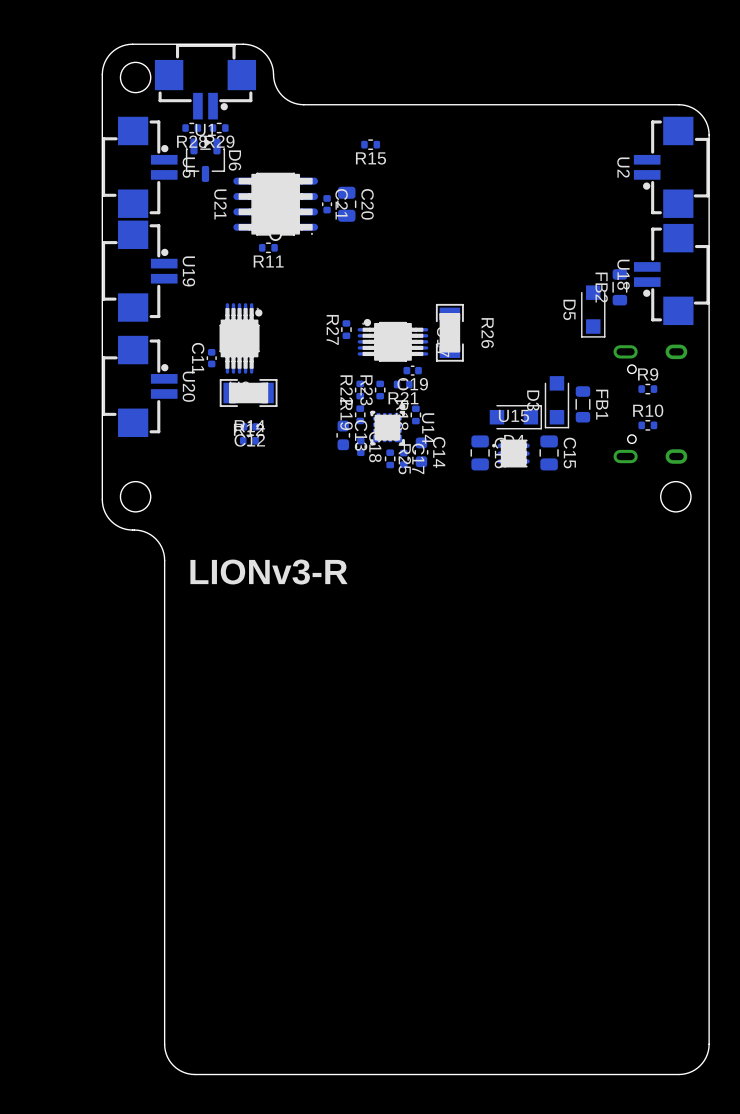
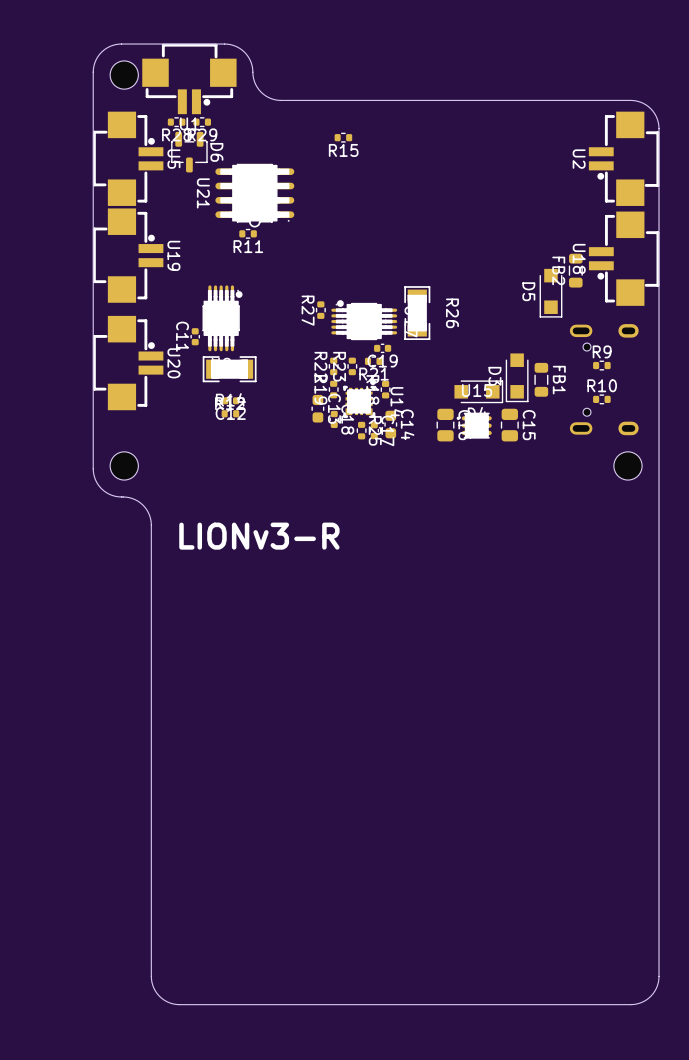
C21: (327, 204) -> none
C20: (346, 204) -> none

